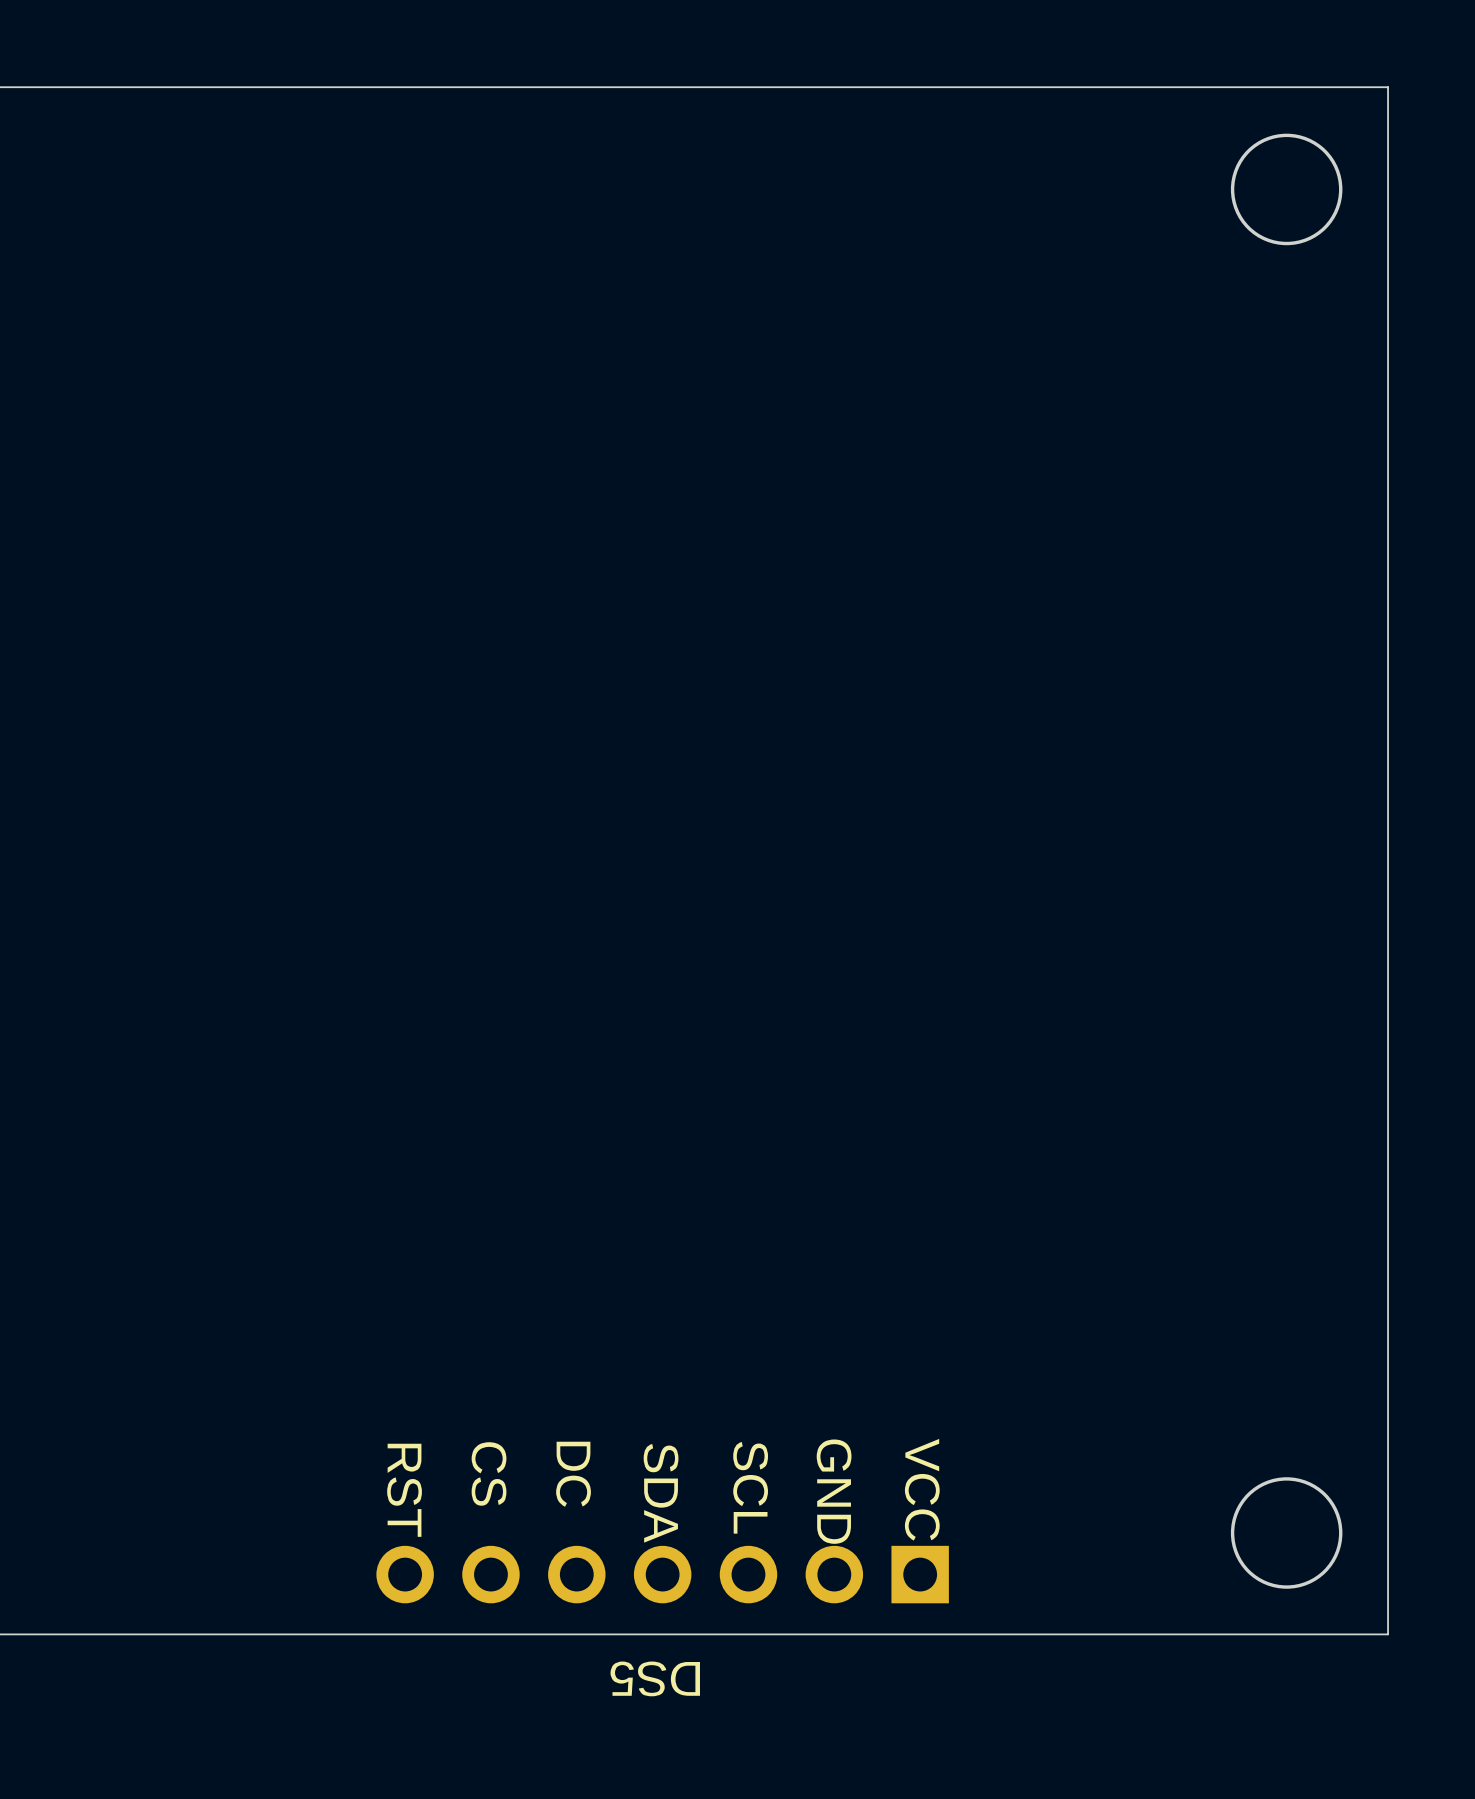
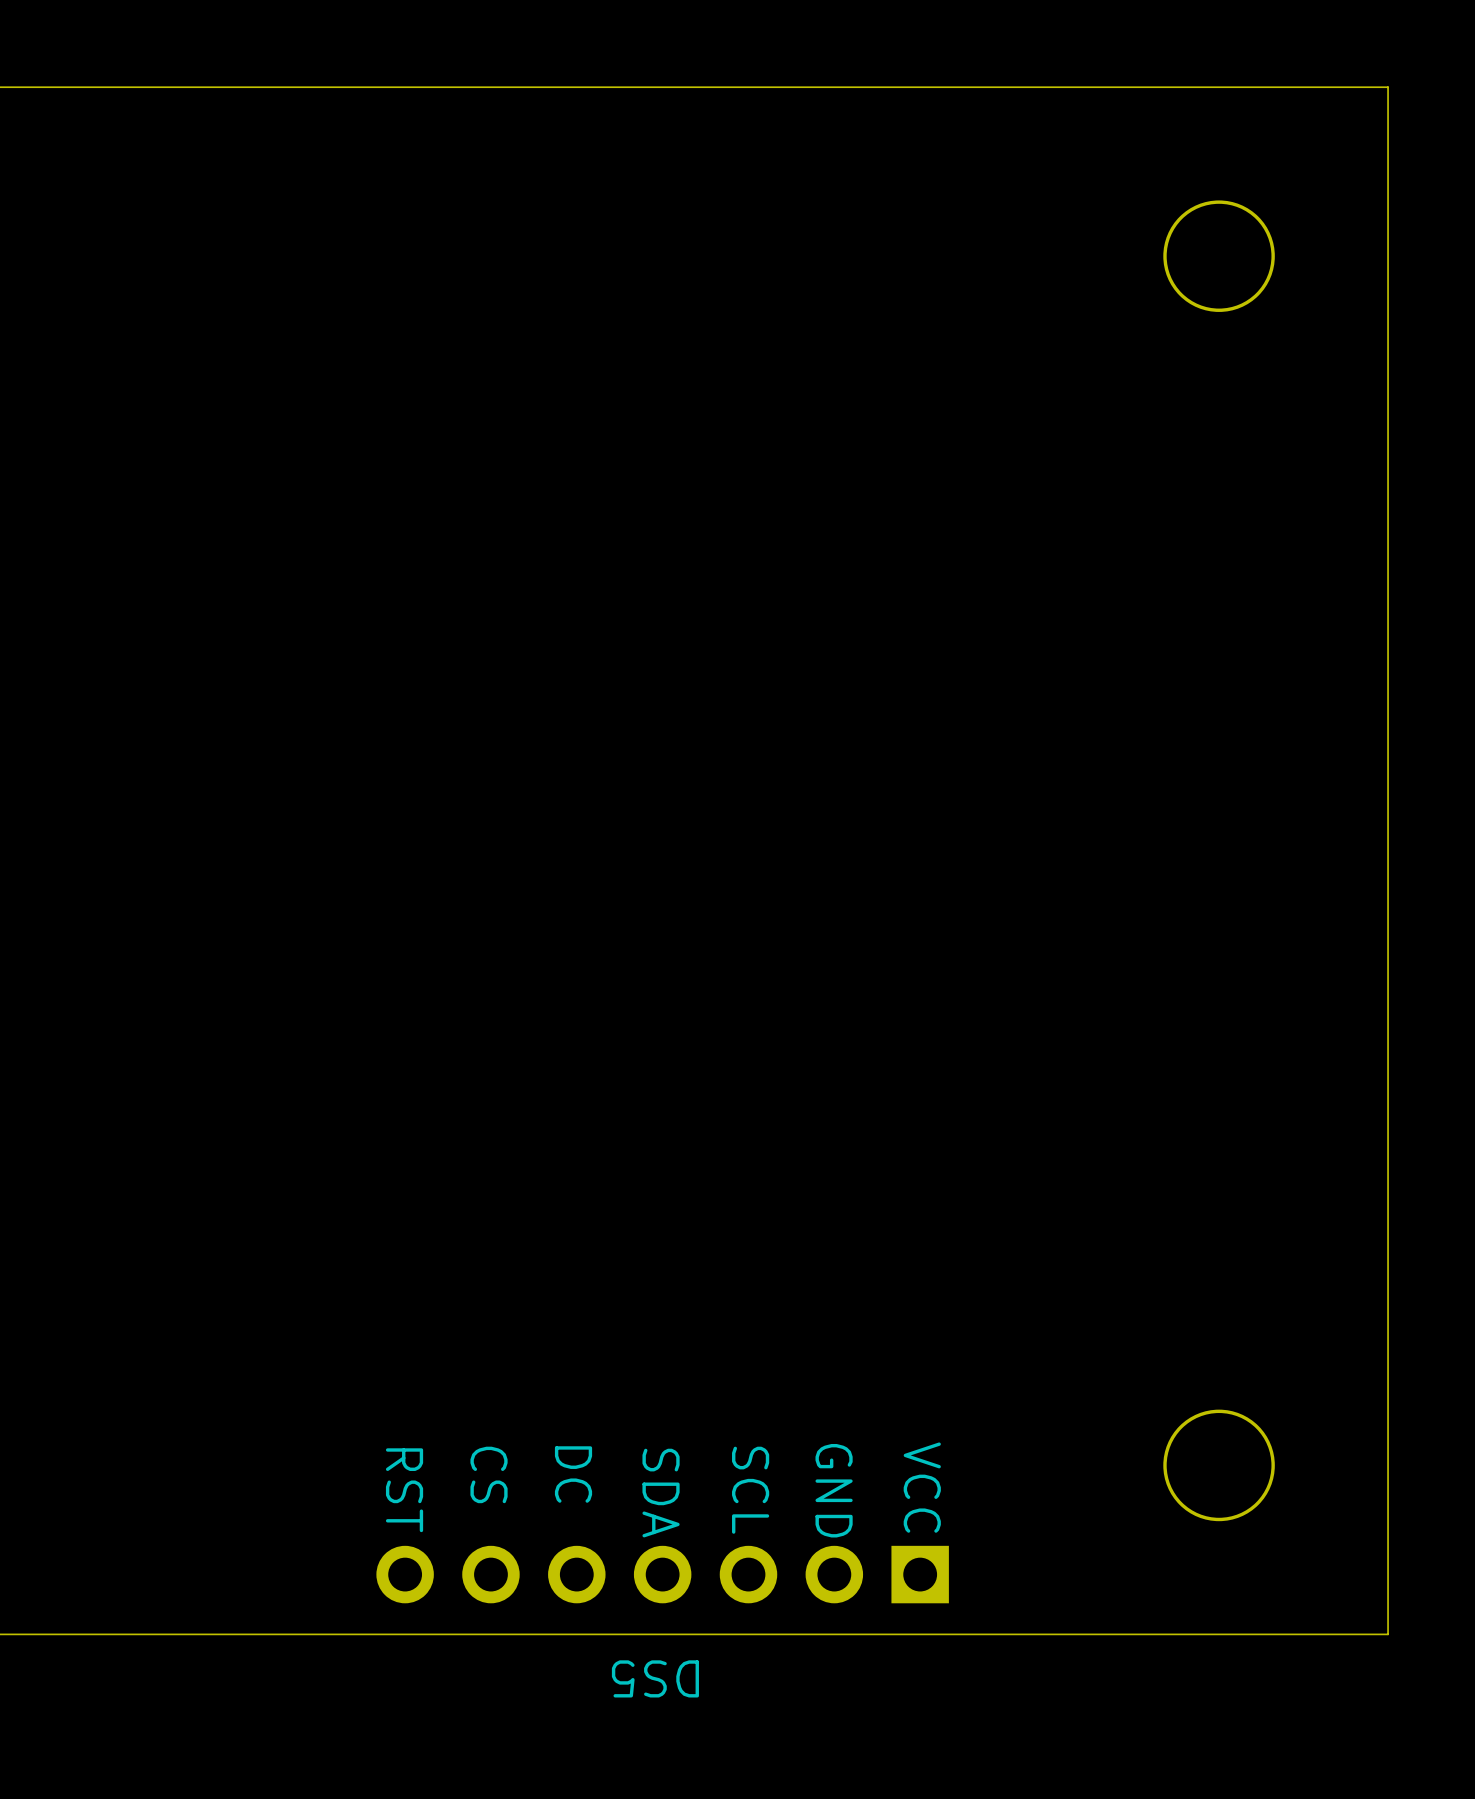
round board edge position: (1286, 189) -> (1219, 256)
round board edge position: (1286, 1533) -> (1219, 1465)

